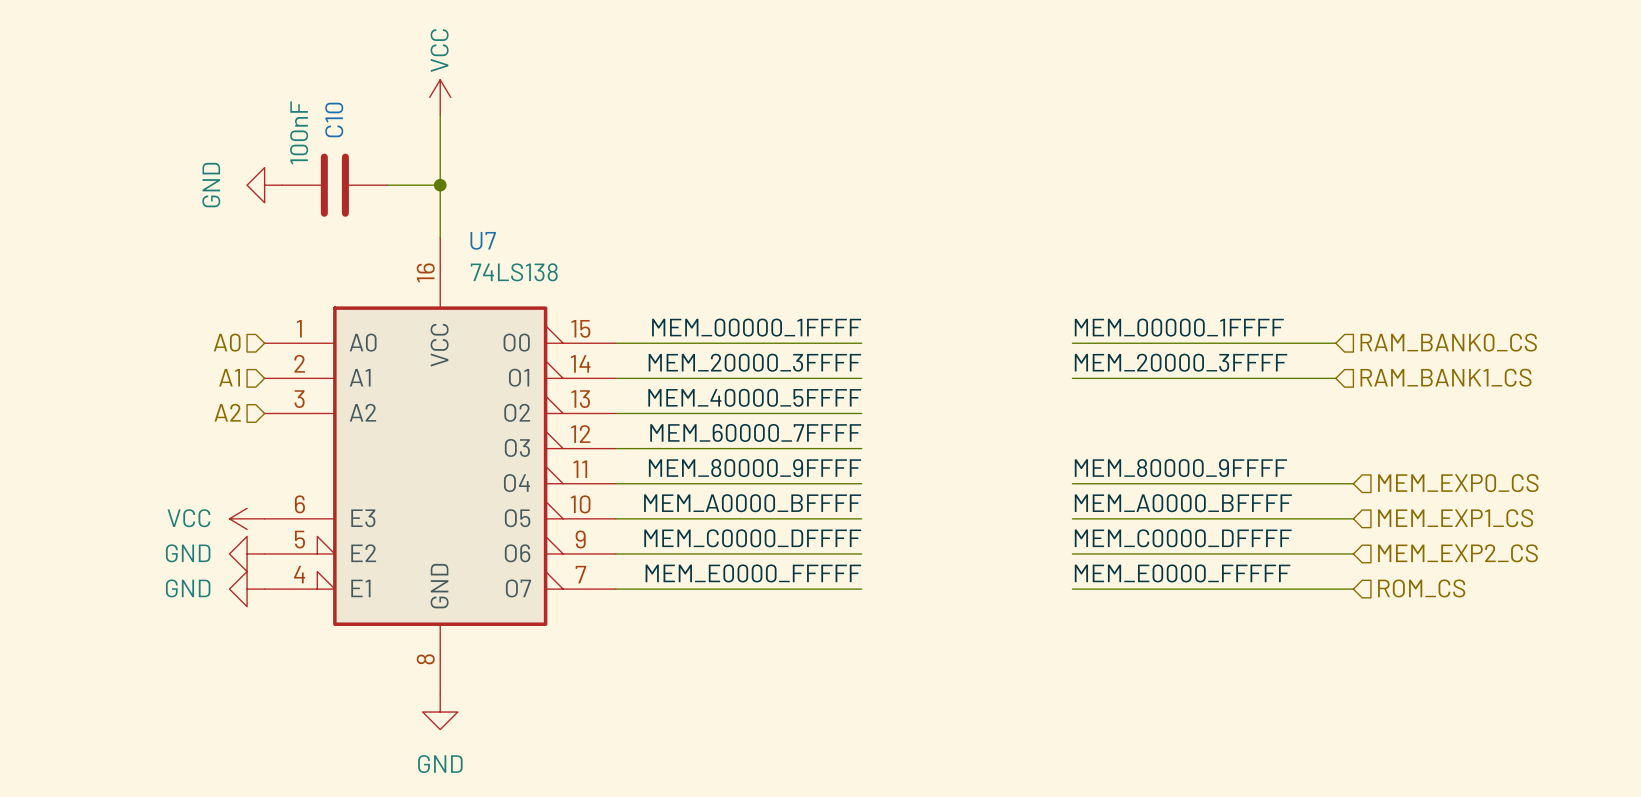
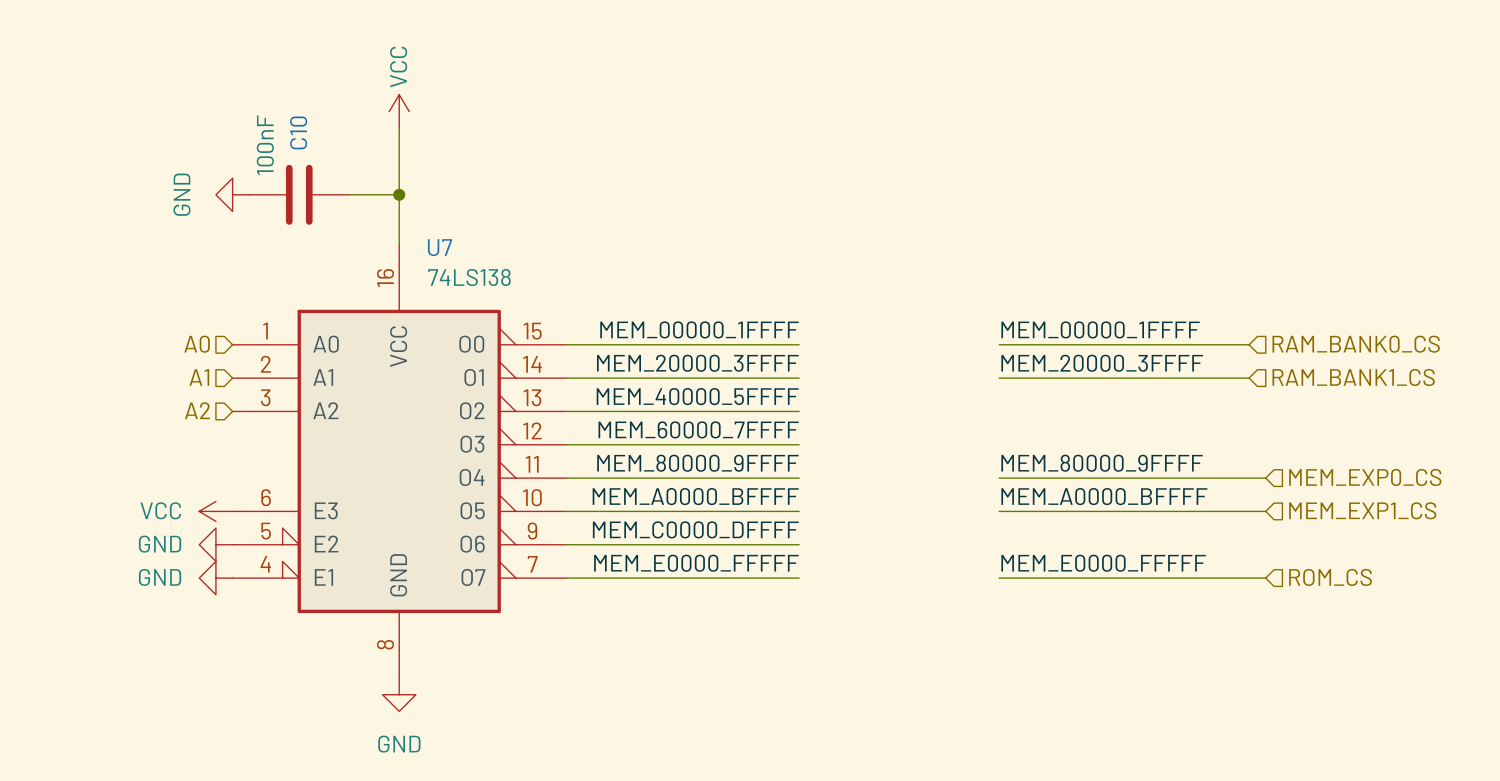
label: MEM_C0000_DFFFF (1183, 538) -> none
wire: (1072, 553) (1353, 553) -> none
hierarchical label: MEM_EXP2_CS (1457, 553) -> none

